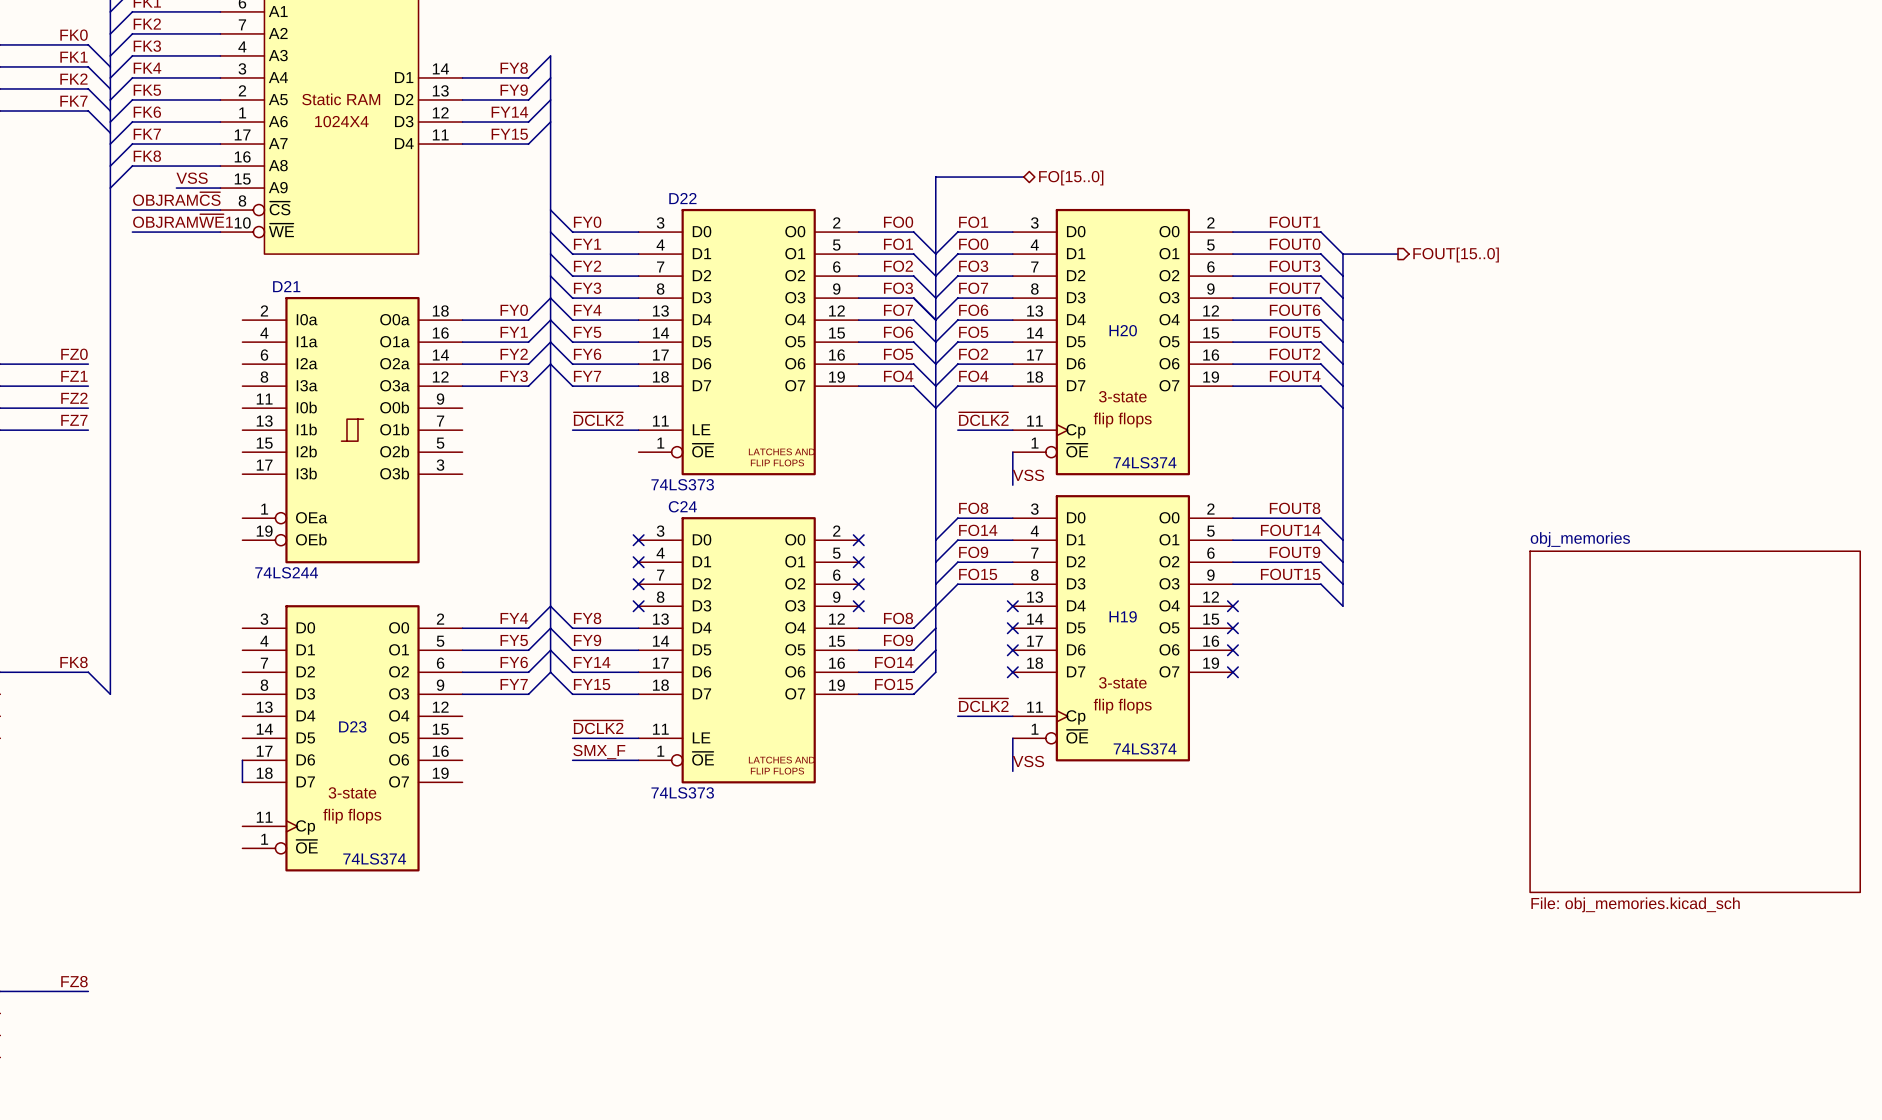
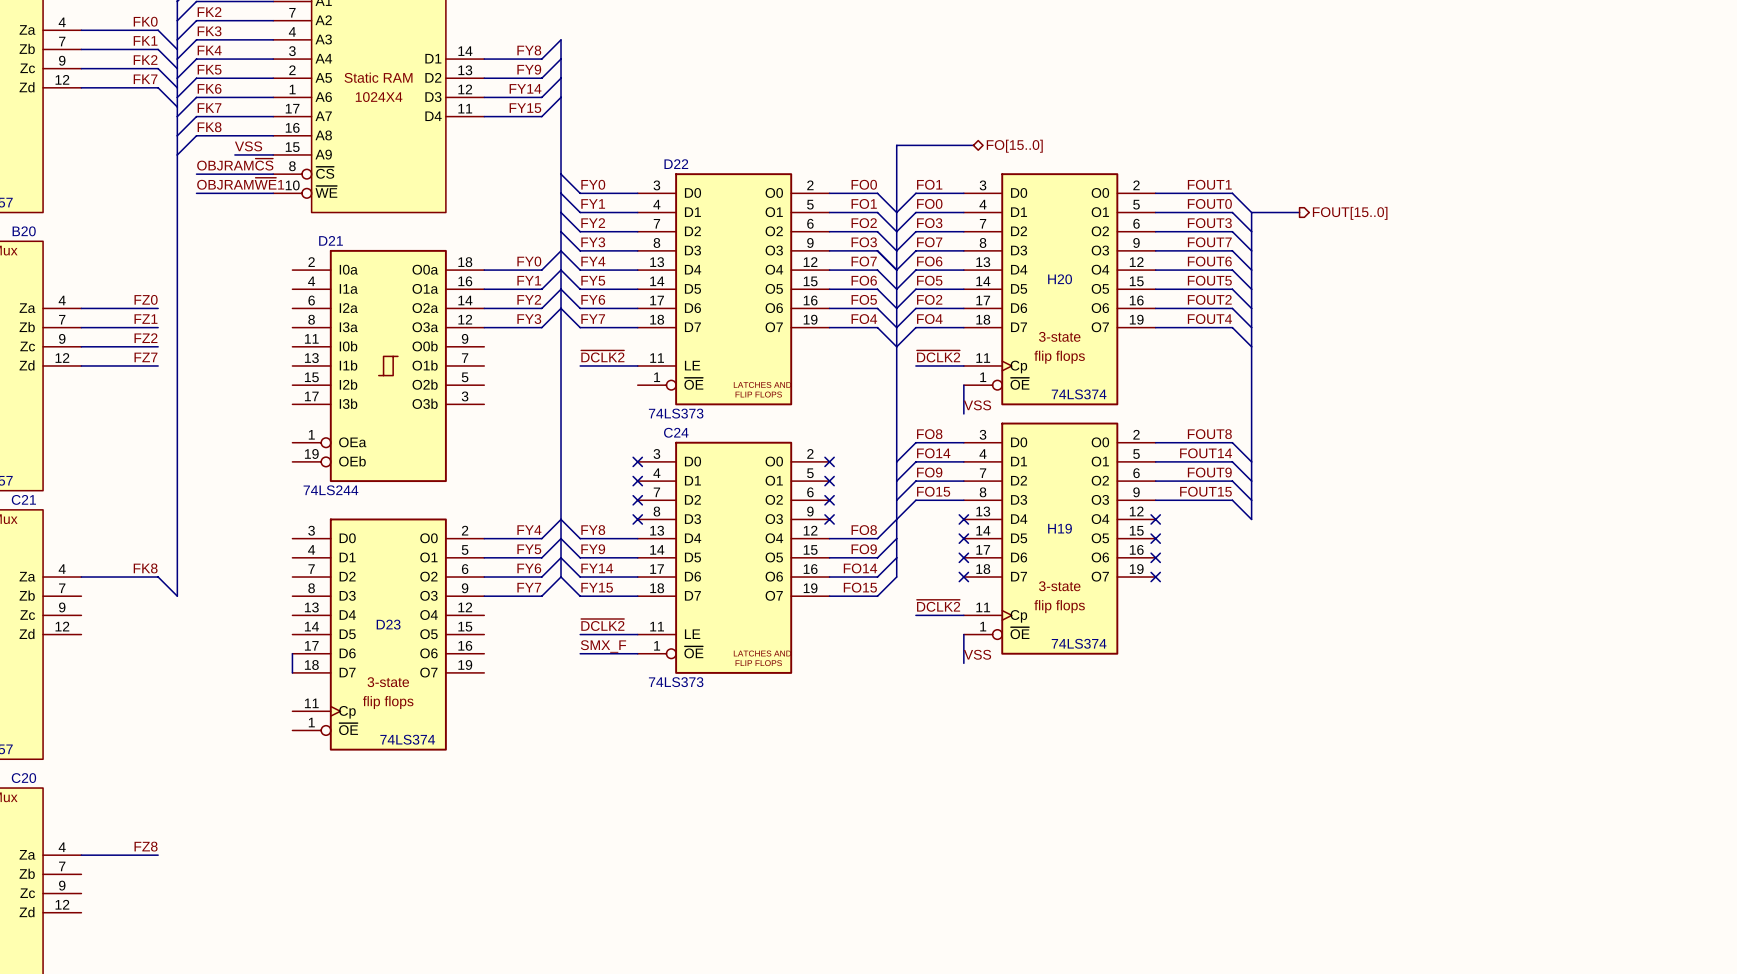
sheet obj_memories: File: obj_memories.kicad_sch (1695, 721) -> none

